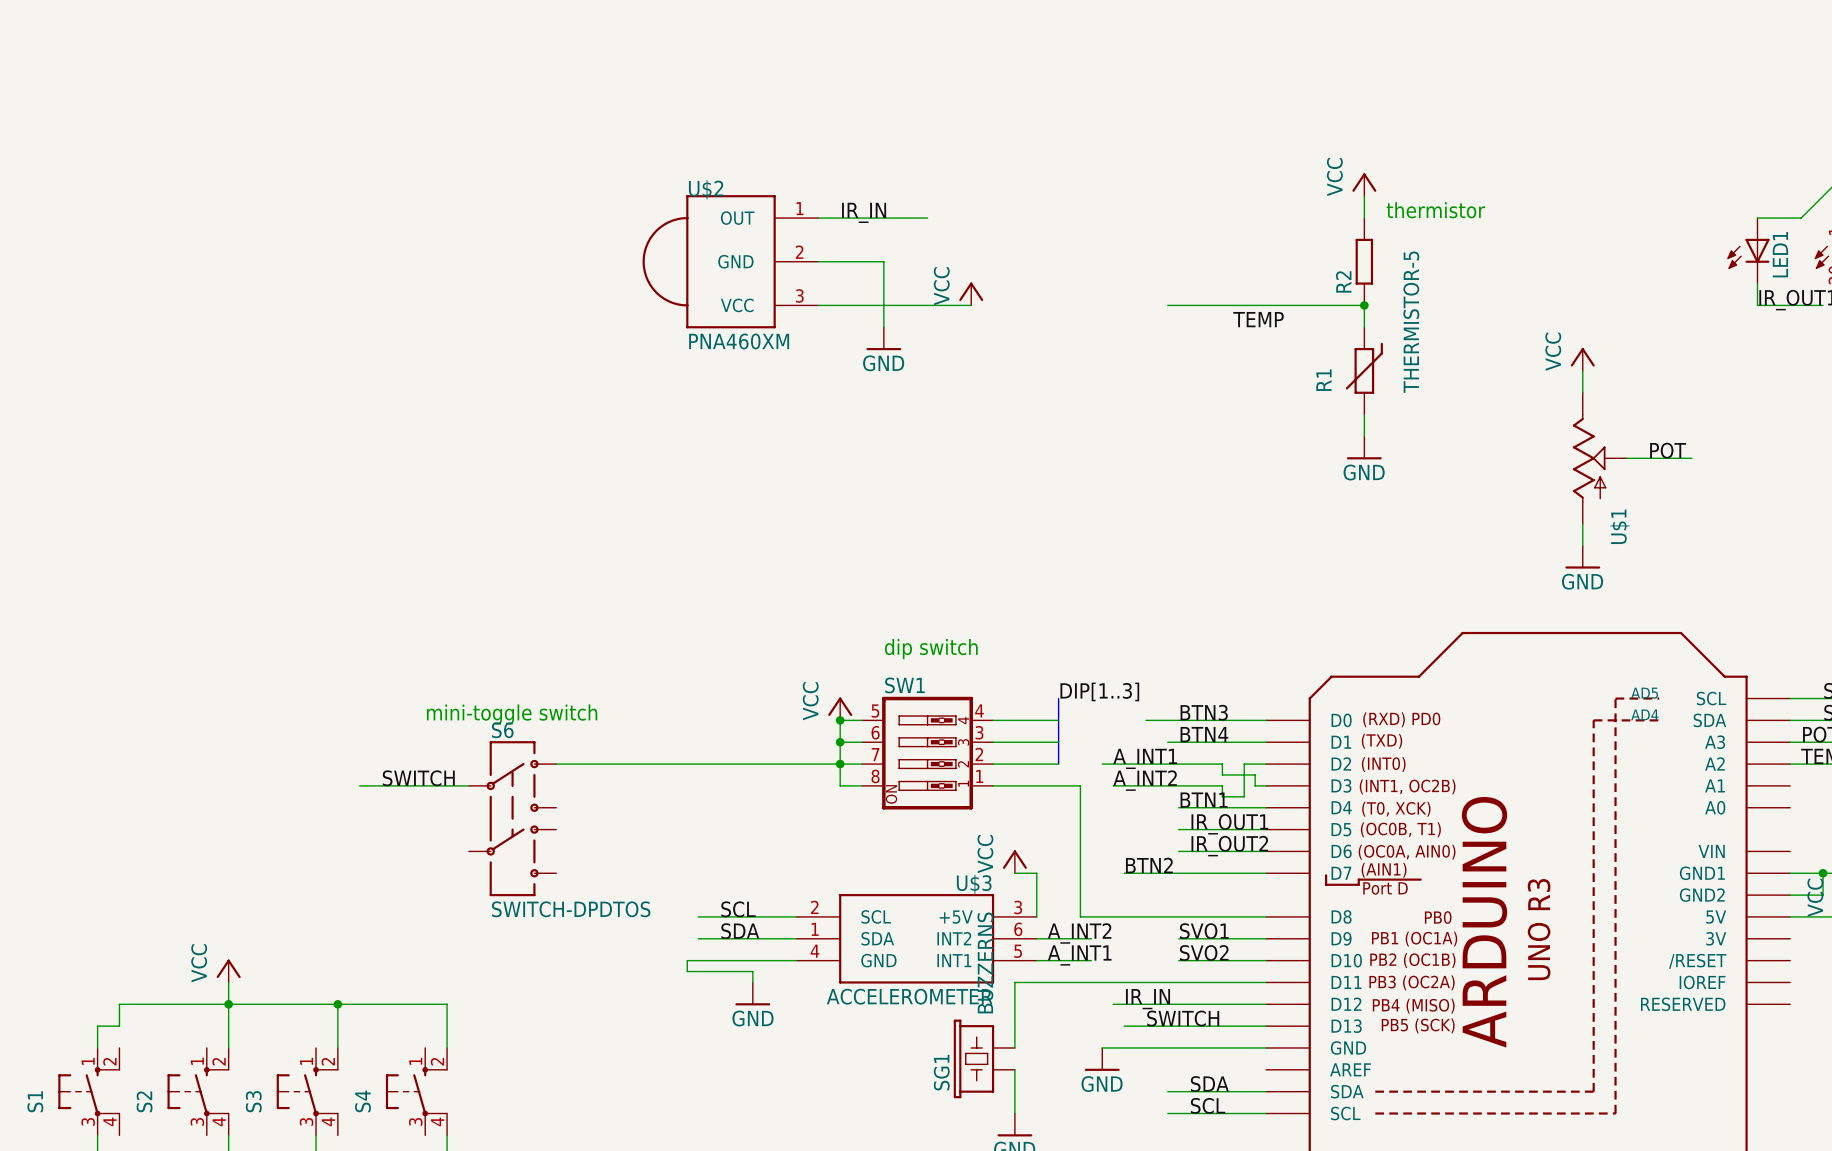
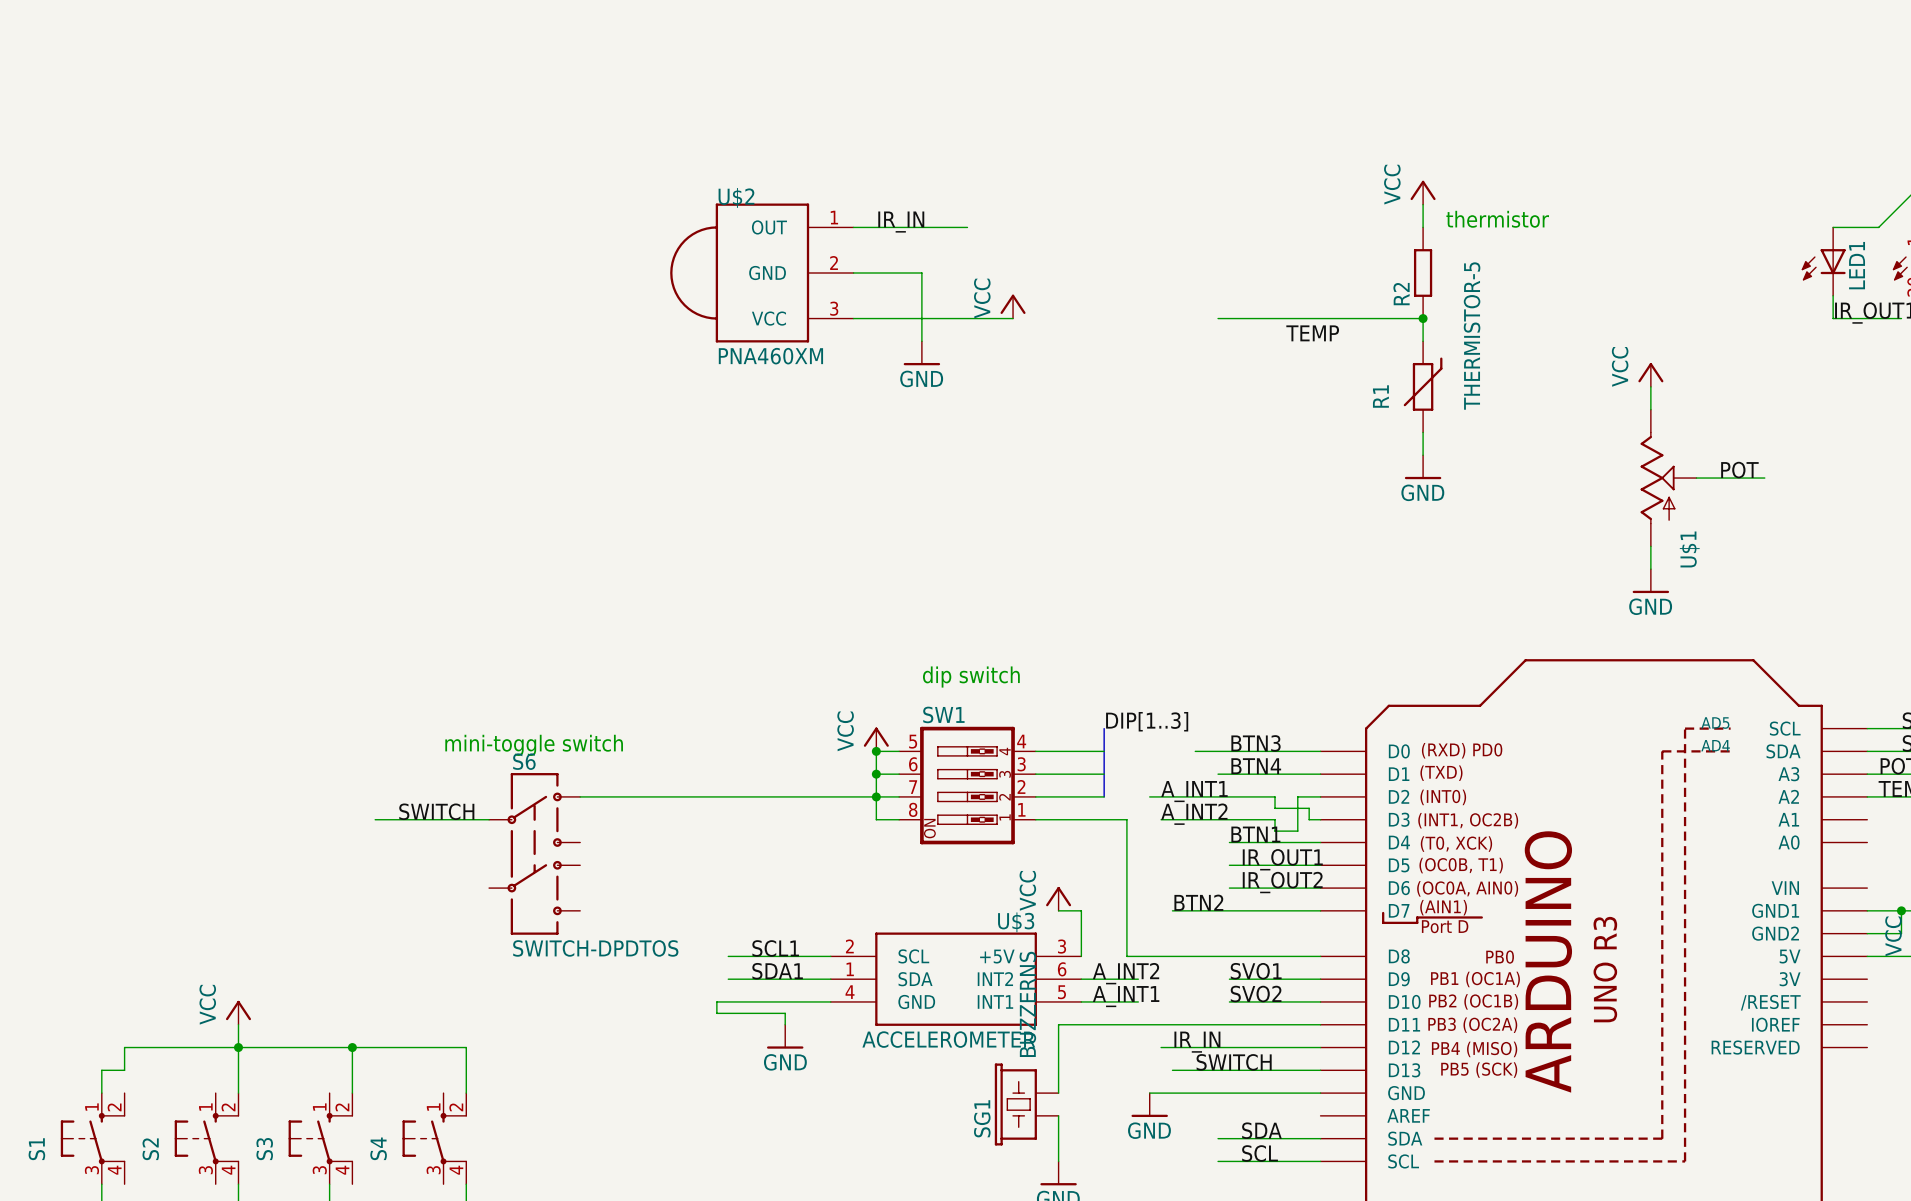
label: SCL (738, 909) -> SCL1 (775, 948)
label: SDA (740, 931) -> SDA1 (777, 971)

